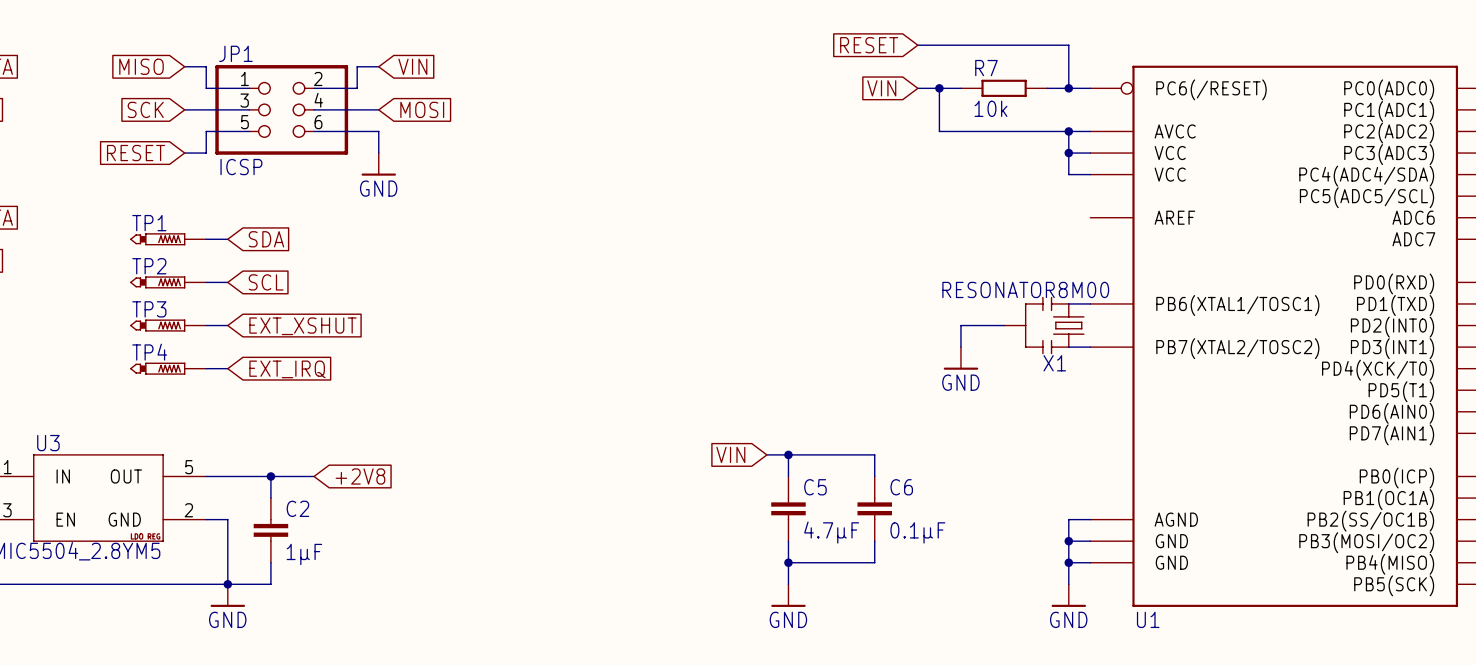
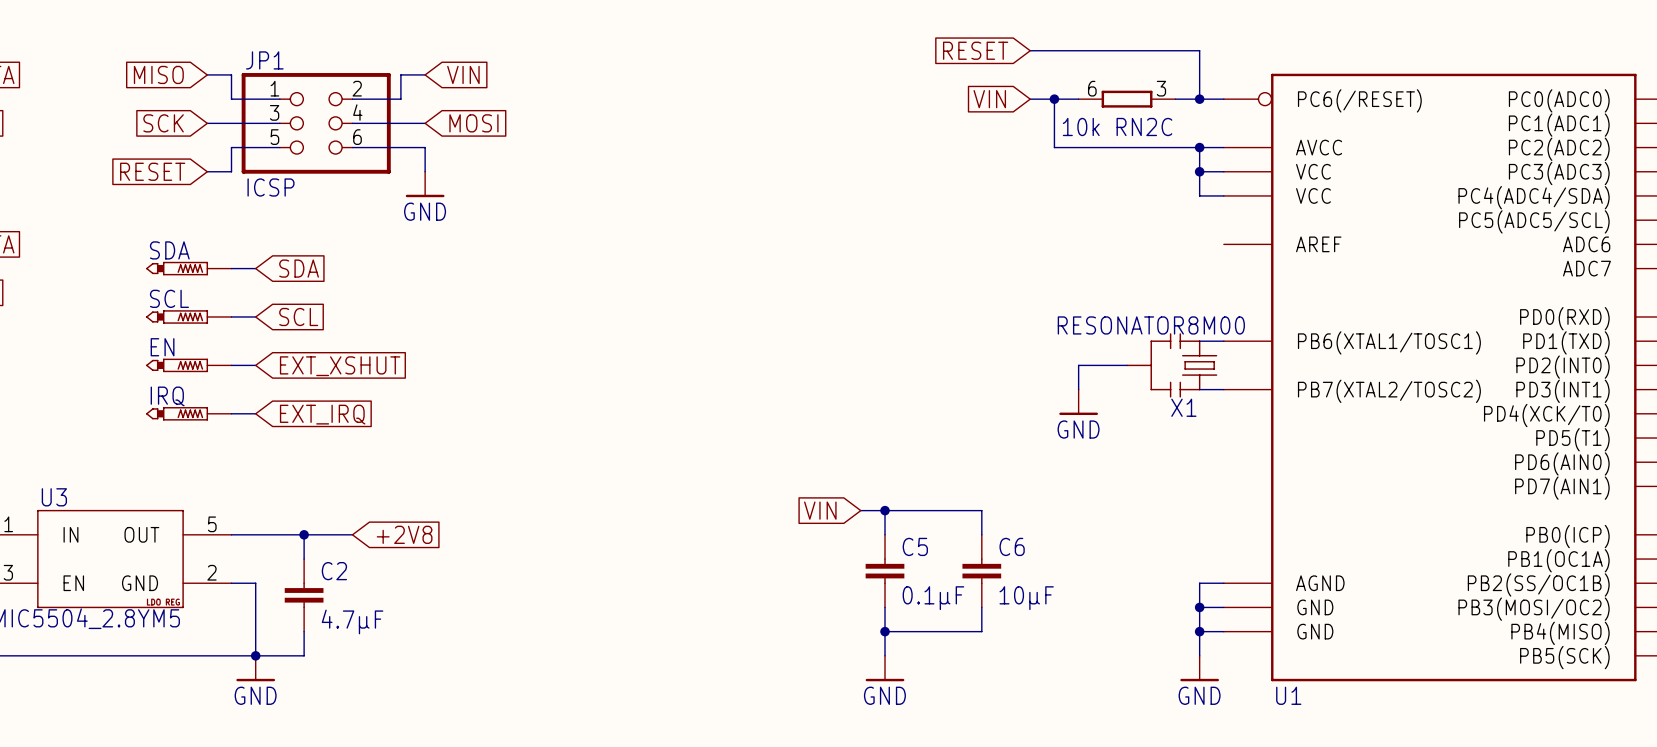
R7: 10k (1004, 88) -> none
RN2C: none -> 10k (1127, 99)
TP1 name: TP1 (149, 223) -> SDA (169, 250)
TP2 name: TP2 (149, 266) -> SCL (169, 298)
TP3 name: TP3 (149, 309) -> EN (162, 347)
TP4 name: TP4 (149, 352) -> IRQ (167, 396)
C5 value: 4.7µF (831, 532) -> 0.1µF (933, 598)
C6 value: 0.1µF (917, 532) -> 10µF (1026, 598)
C2 value: 1µF (304, 554) -> 4.7µF (352, 621)

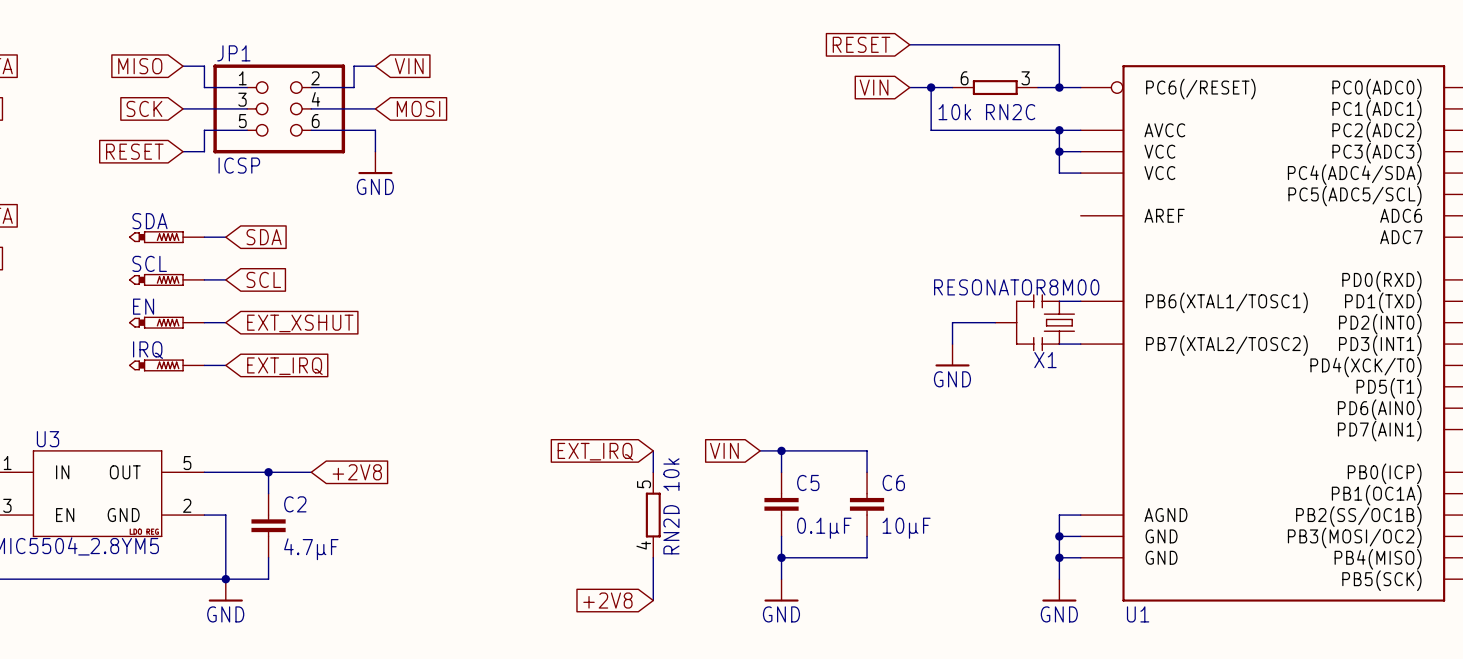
wire: none -> (653, 450) (653, 472)
global label: none -> EXT_IRQ (595, 451)
RN2D: none -> 10k (653, 515)
wire: none -> (653, 557) (653, 600)
global label: none -> +2V8 (607, 600)

